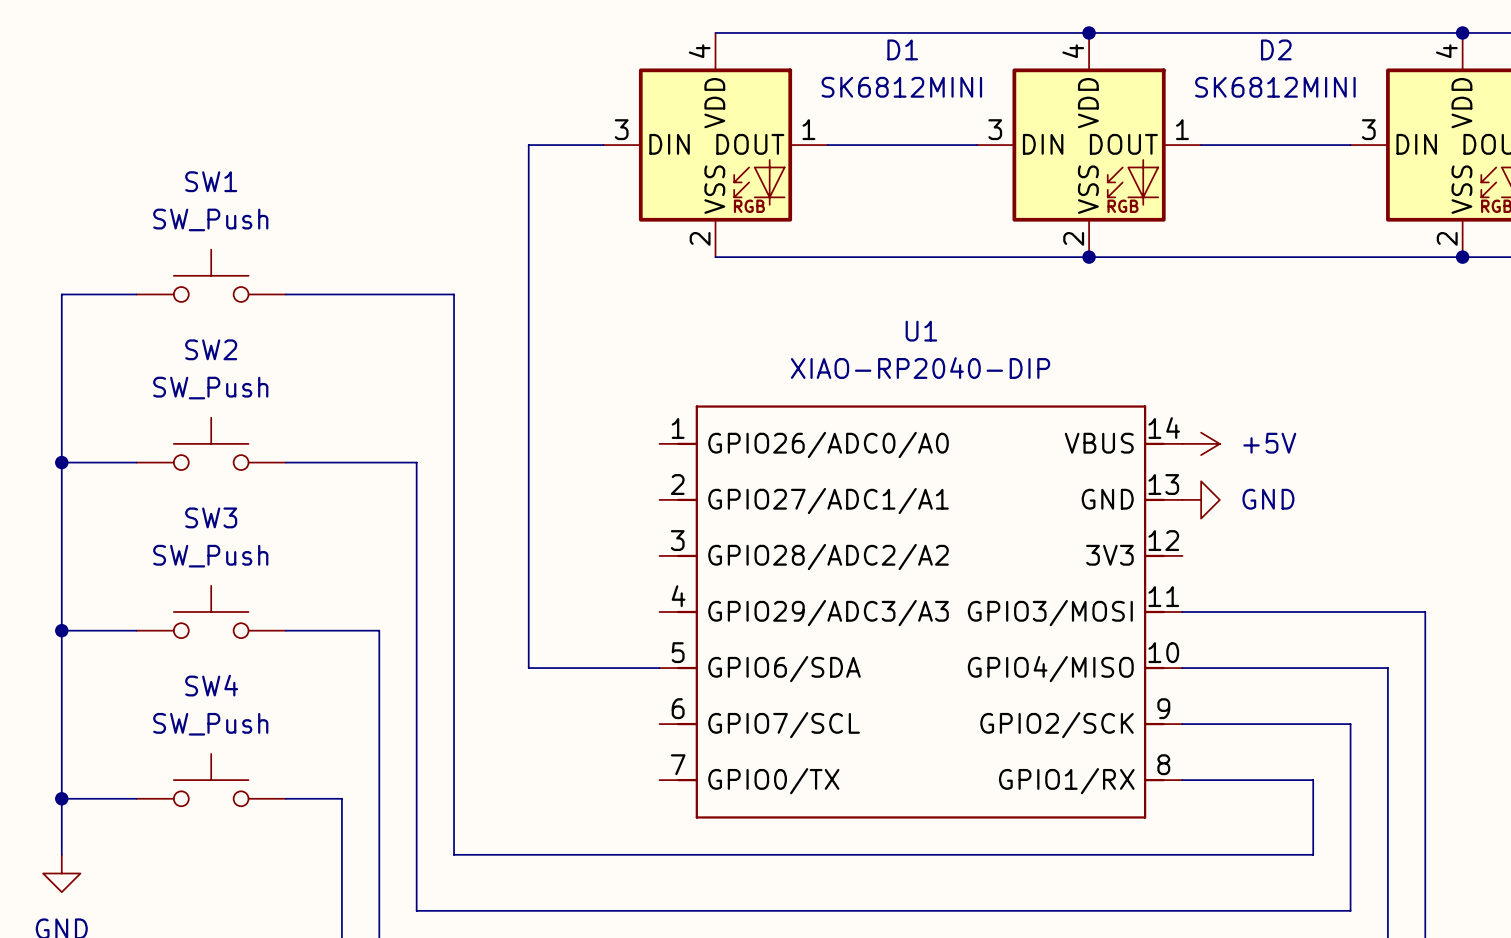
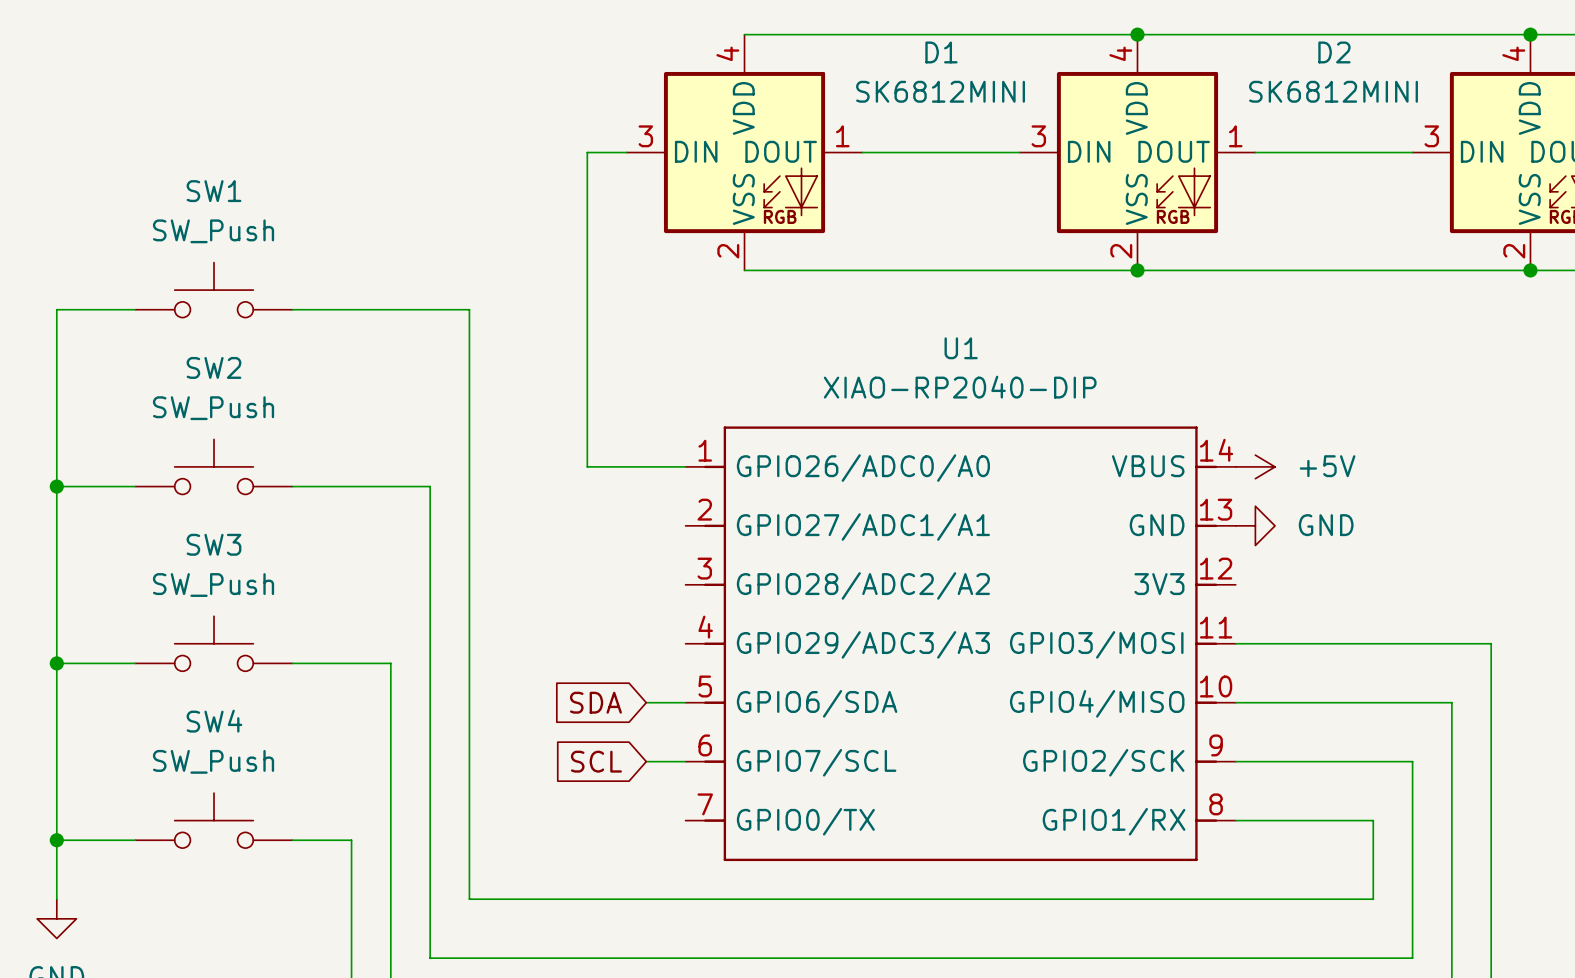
wire: (566, 145) (528, 145) (528, 668) (622, 668) -> (587, 152) (587, 466) (685, 466)
global label: none -> SDA (595, 702)
global label: none -> SCL (596, 761)
wire: none -> (646, 761) (685, 761)

